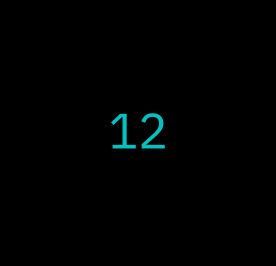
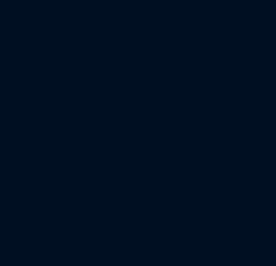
drawing: [111, 113, 165, 149] -> none

